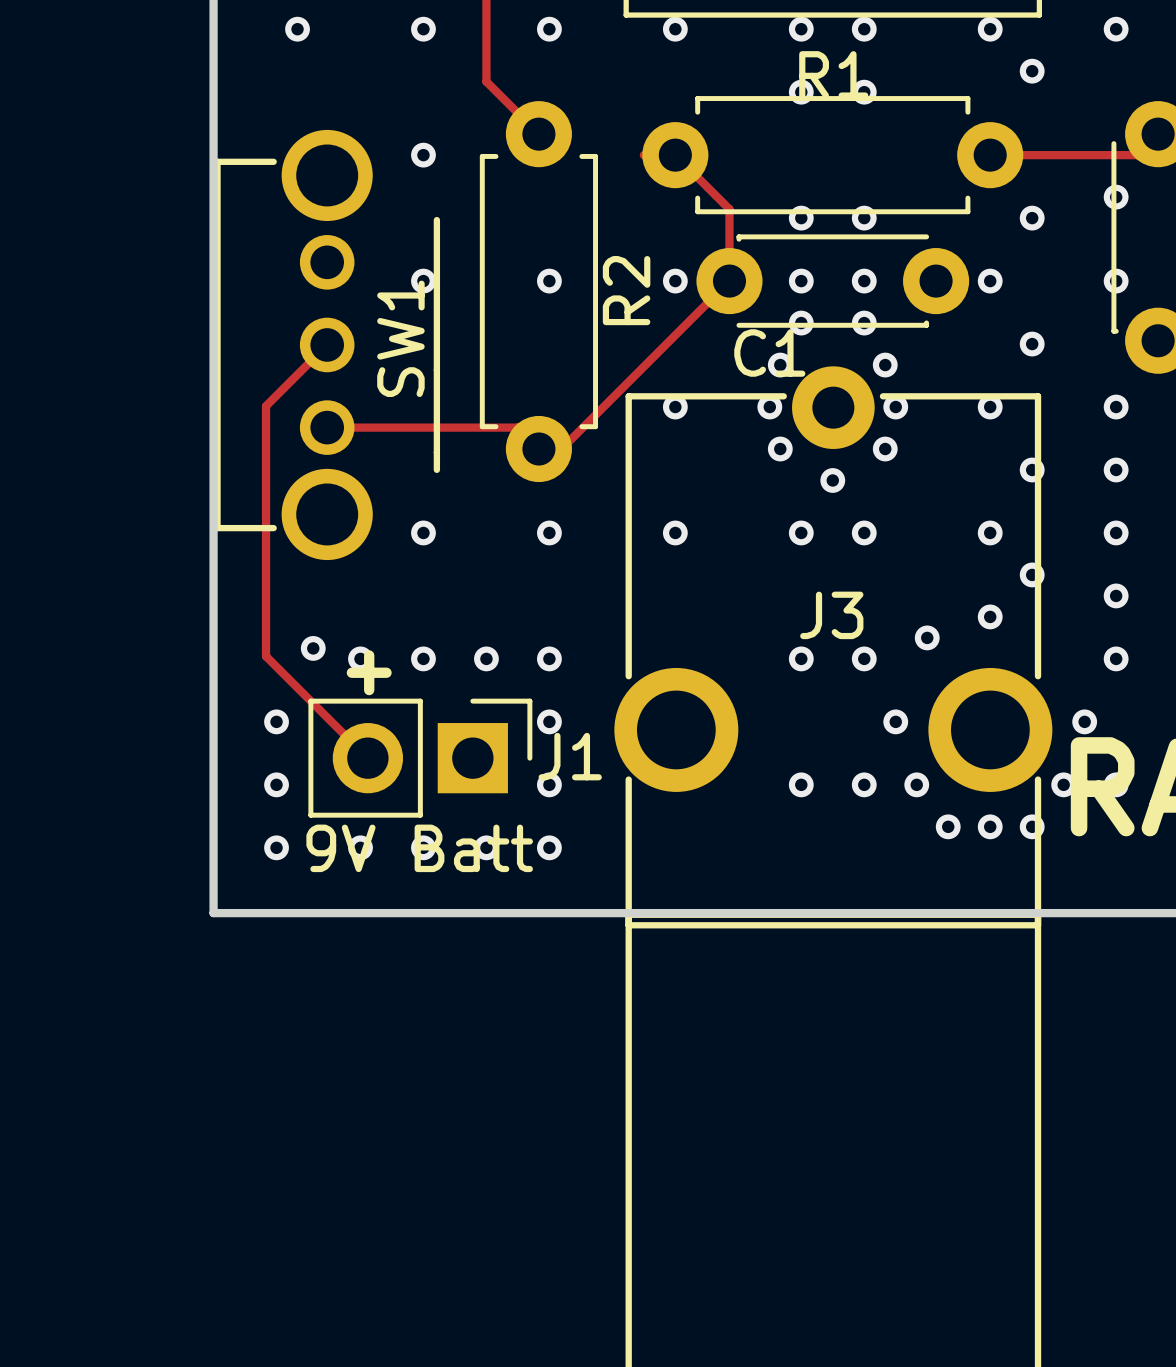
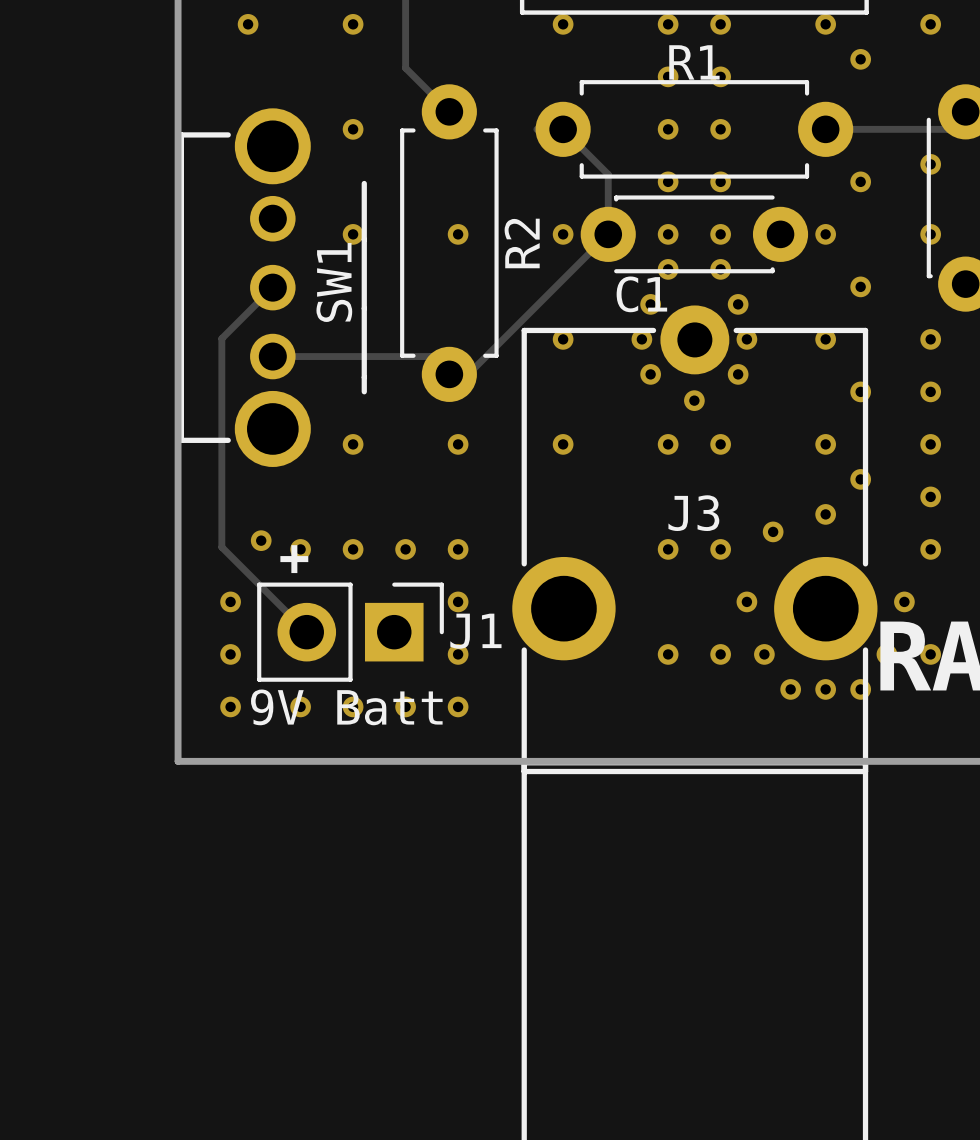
via: (549, 29) -> none
via: none -> (668, 129)
via: none -> (720, 129)

